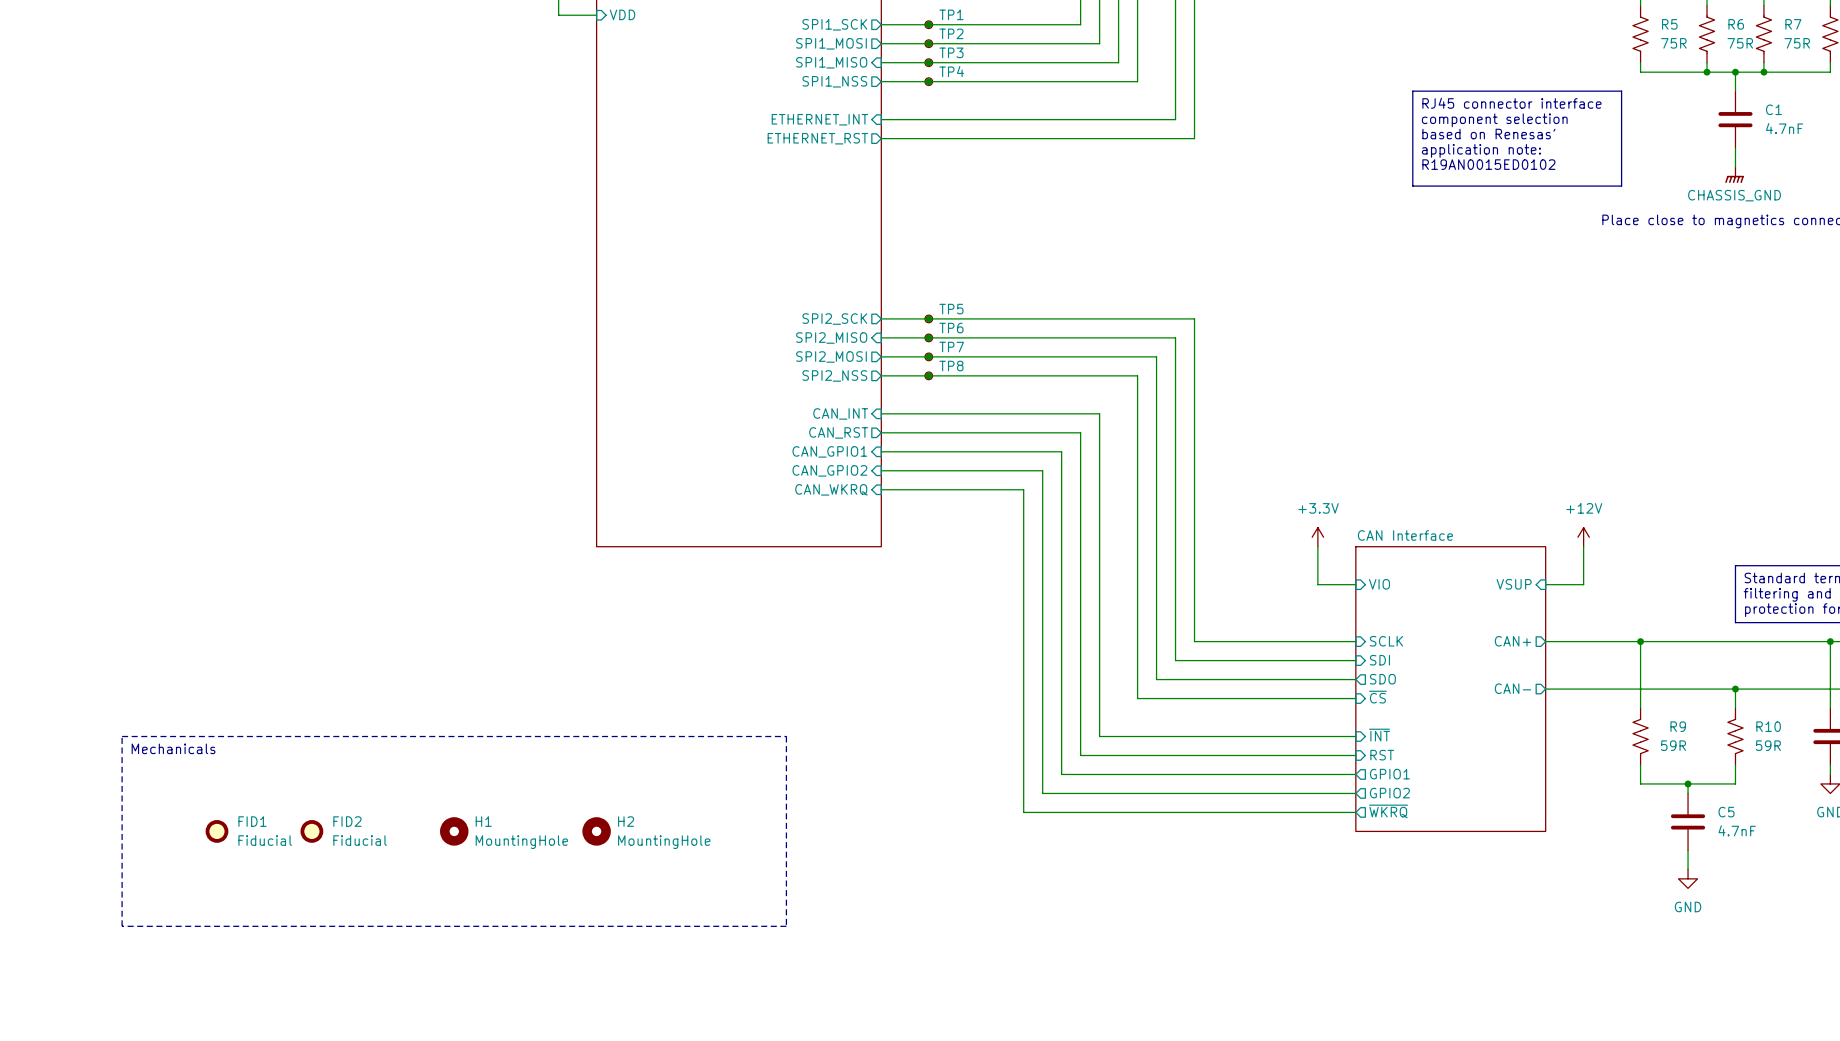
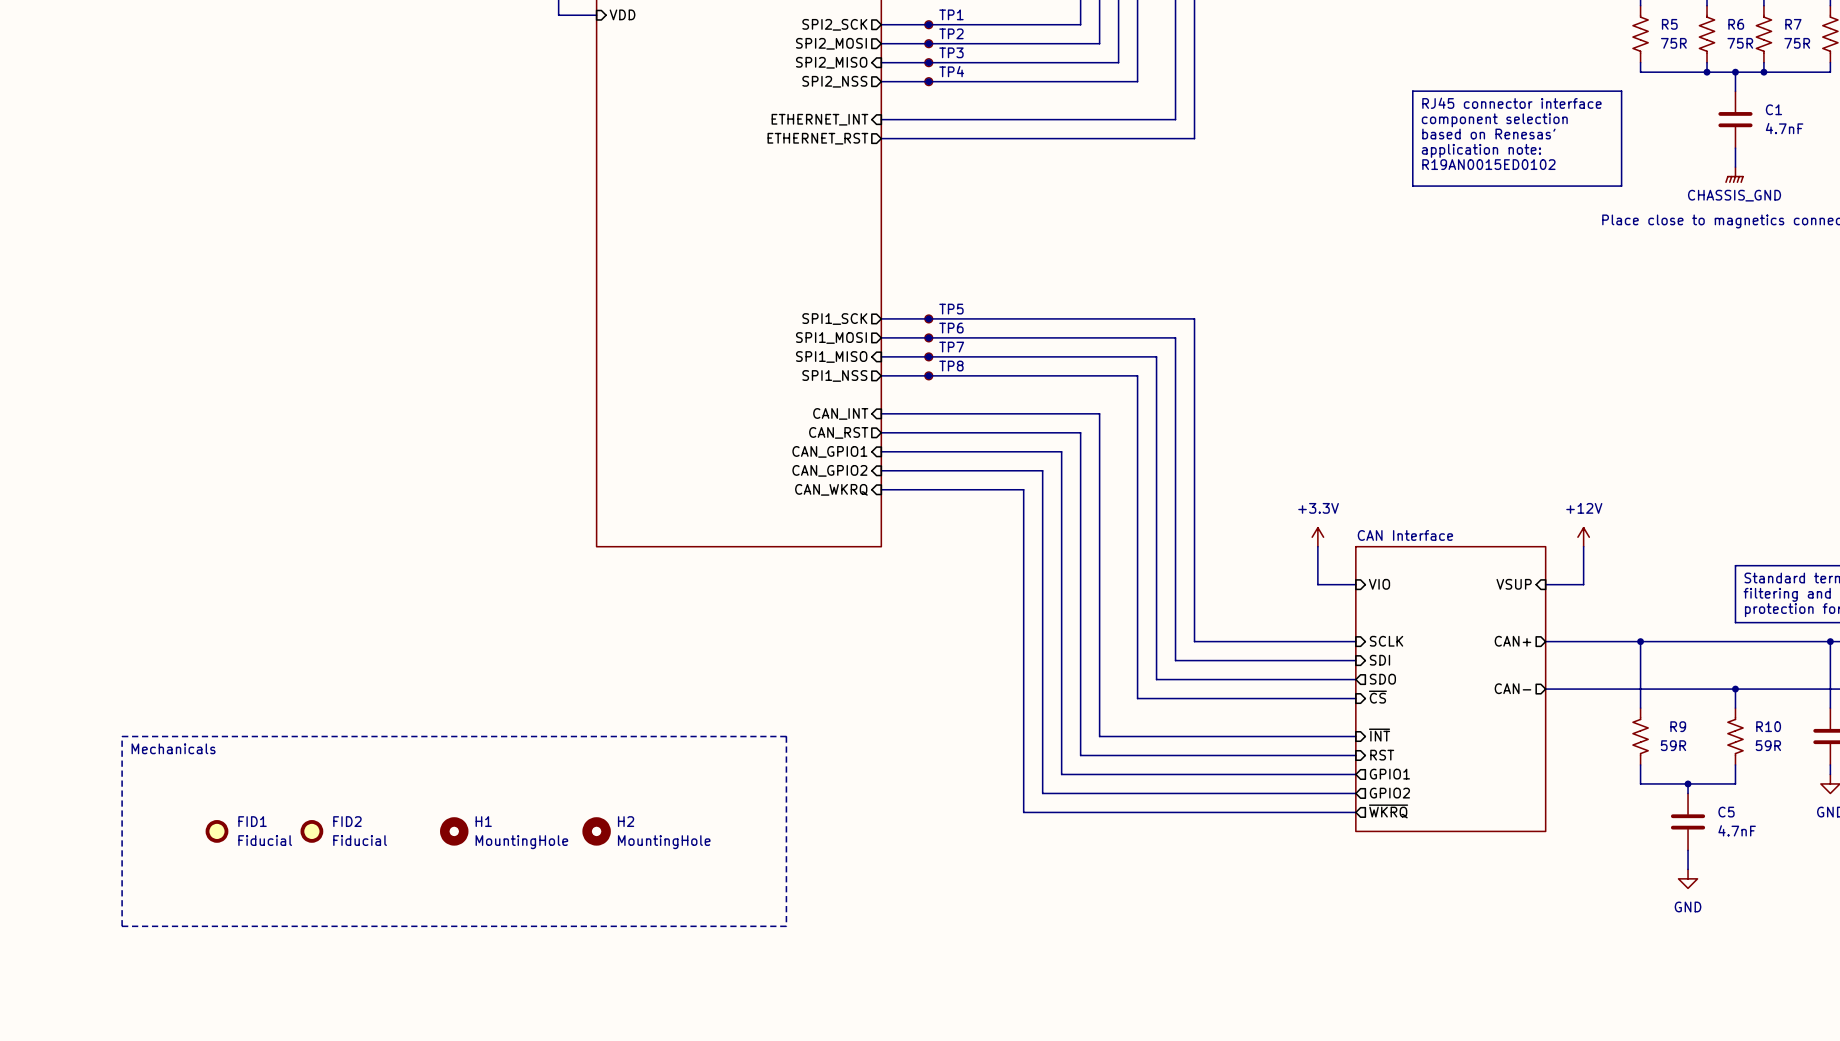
sheet pin: SPI1_SCK (834, 24) -> SPI2_SCK (834, 24)
sheet pin: SPI1_MOSI (831, 43) -> SPI2_MOSI (831, 43)
sheet pin: SPI1_MISO (831, 62) -> SPI2_MISO (831, 62)
sheet pin: SPI1_NSS (834, 81) -> SPI2_NSS (834, 81)
sheet pin: SPI2_SCK (834, 319) -> SPI1_SCK (834, 319)
sheet pin shape: input (831, 338) -> output (831, 338)
sheet pin: SPI2_MISO (831, 338) -> SPI1_MOSI (831, 338)
sheet pin shape: output (831, 356) -> input (831, 356)
sheet pin: SPI2_MOSI (831, 356) -> SPI1_MISO (831, 356)
sheet pin: SPI2_NSS (834, 375) -> SPI1_NSS (834, 375)

